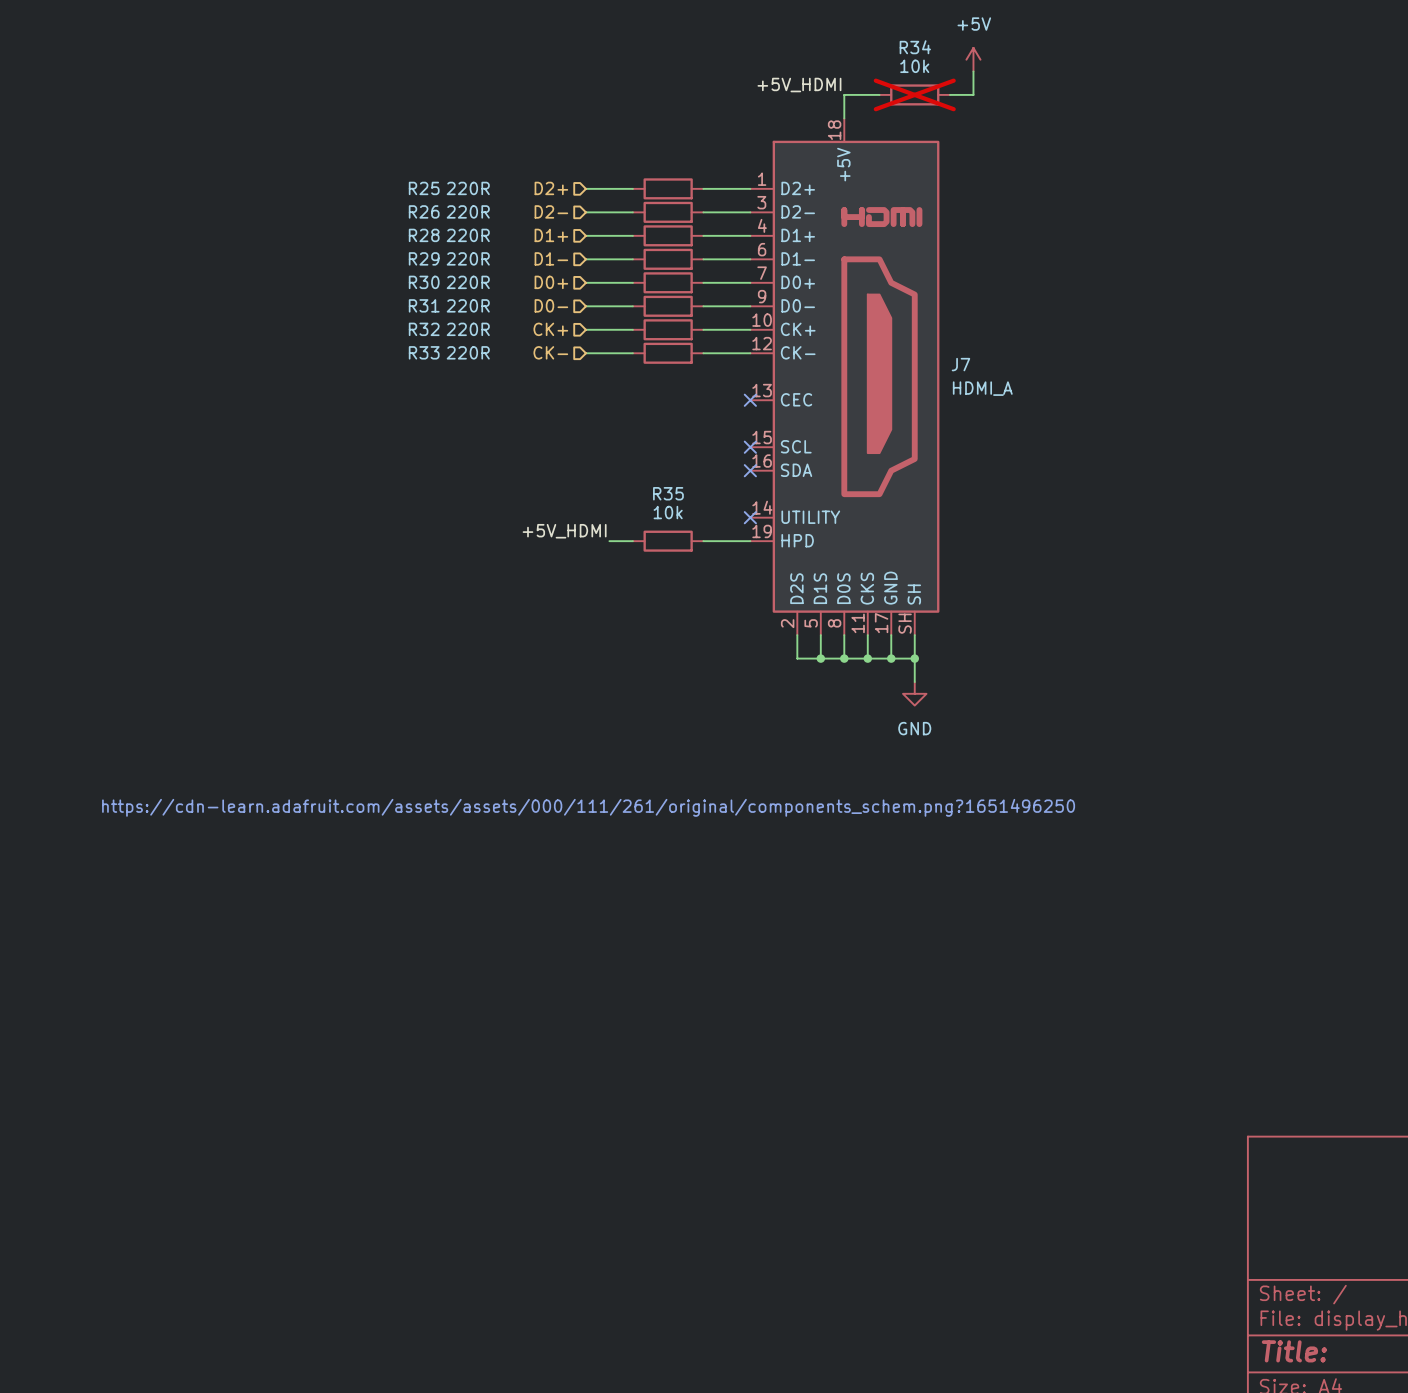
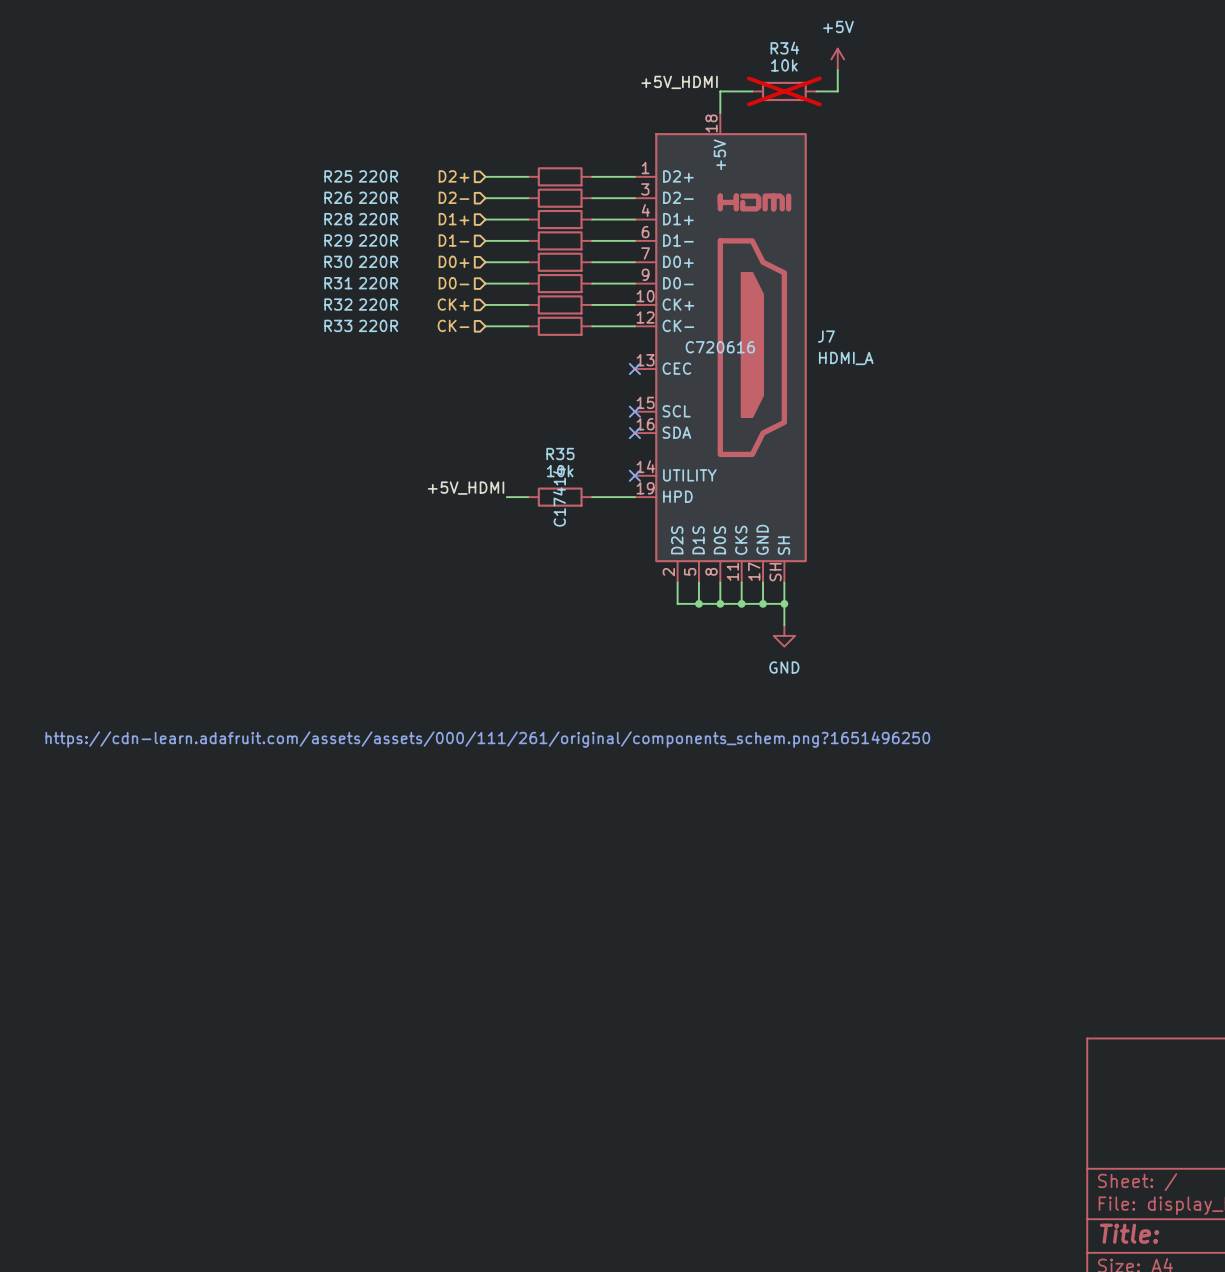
J7 text: none -> C720616 (720, 347)
R35 text: none -> C17414 (559, 496)

